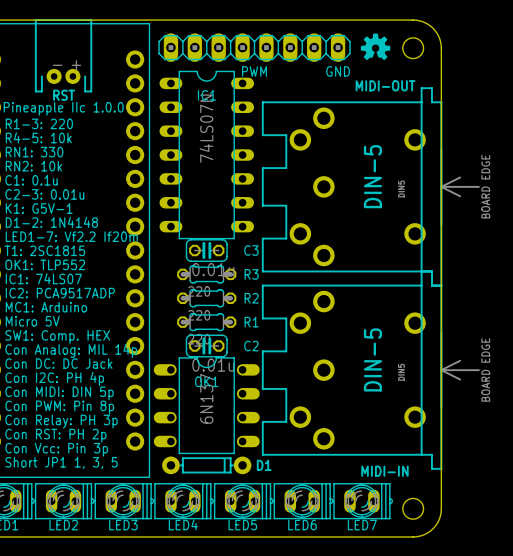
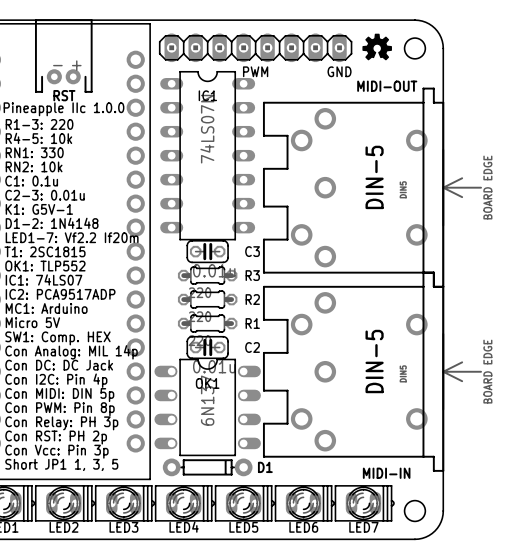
text: Con I2C: PH 4p (54, 379) -> Con I2C: Pin 4p (56, 380)

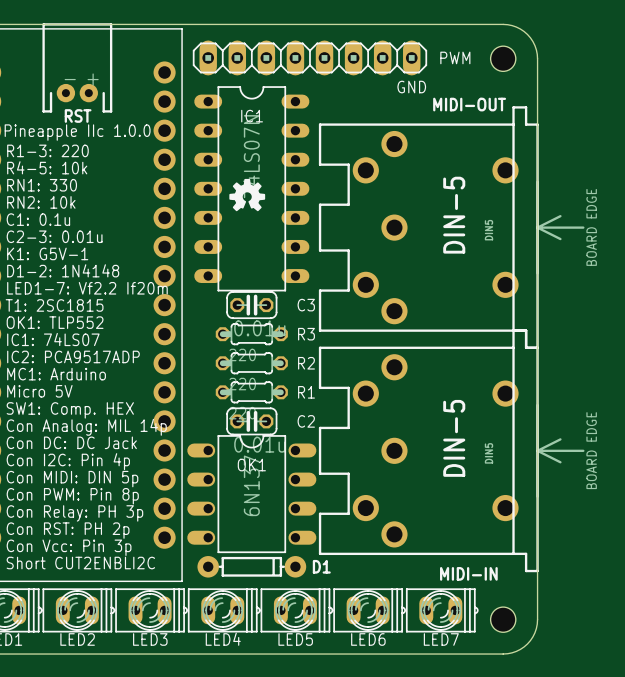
drawing position: (377, 47) -> (247, 195)
PWM name position: PWM (255, 71) -> PWM (455, 57)
text: Short JP1 1, 3, 5 (61, 464) -> Short CUT2ENBLI2C (80, 563)

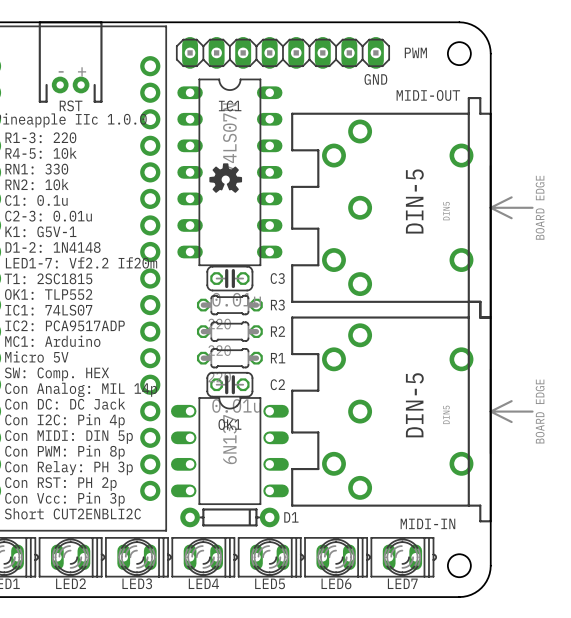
text: SW1: Comp. HEX (70, 410) -> SW: Comp. HEX (56, 374)

